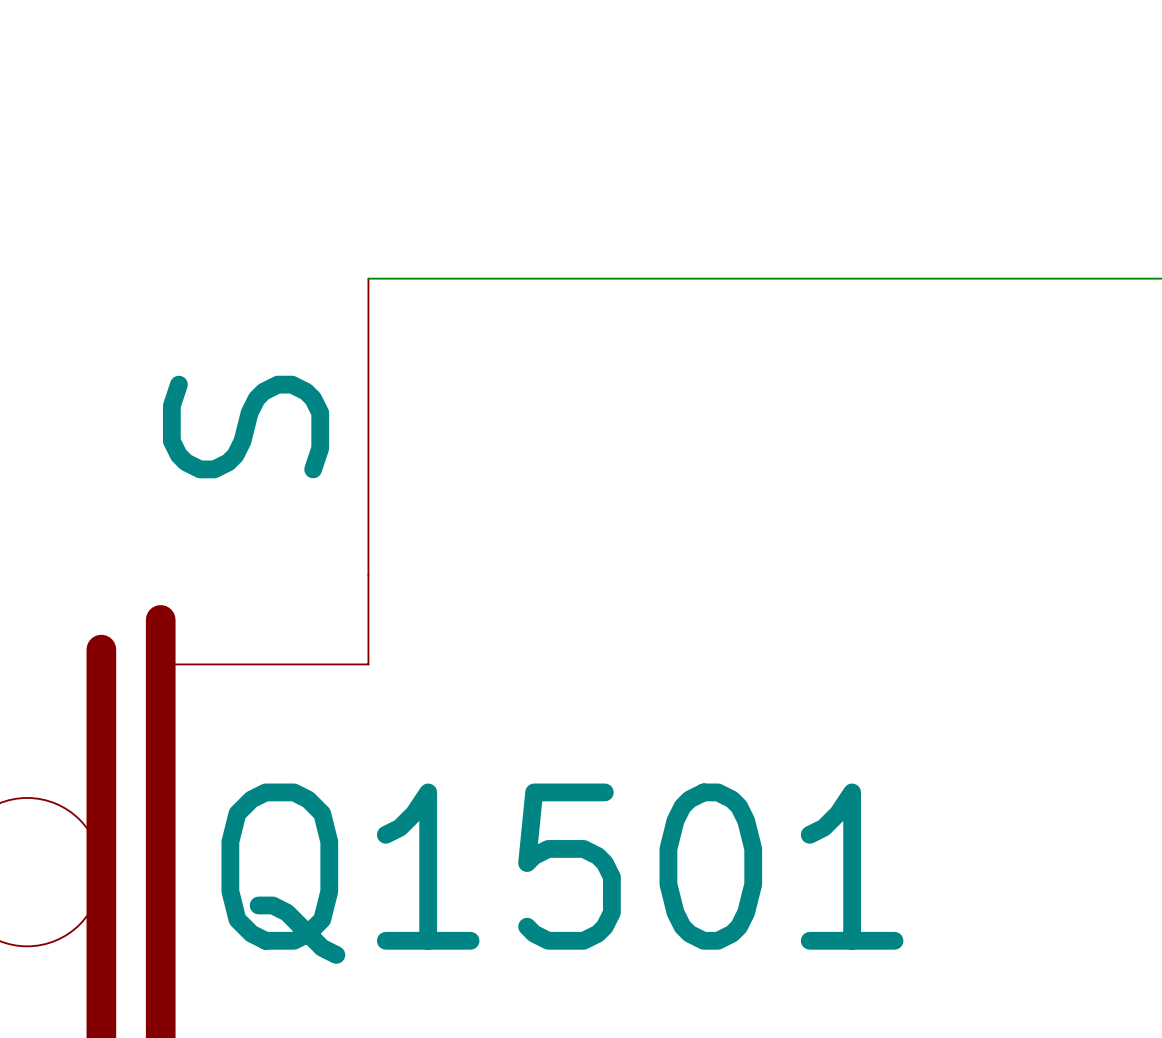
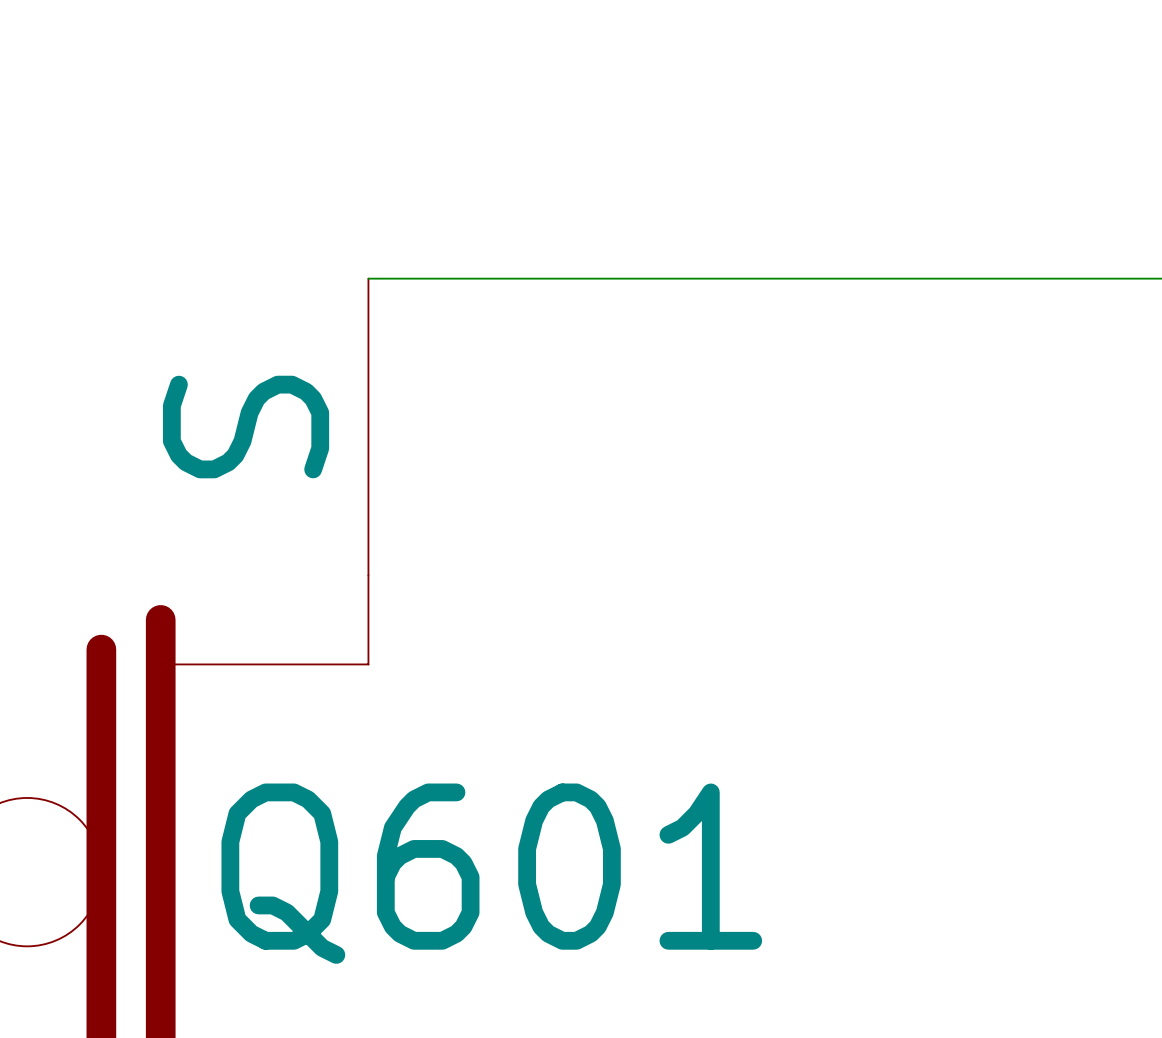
Q1501 name: Q1501 (562, 873) -> Q601 (491, 873)

